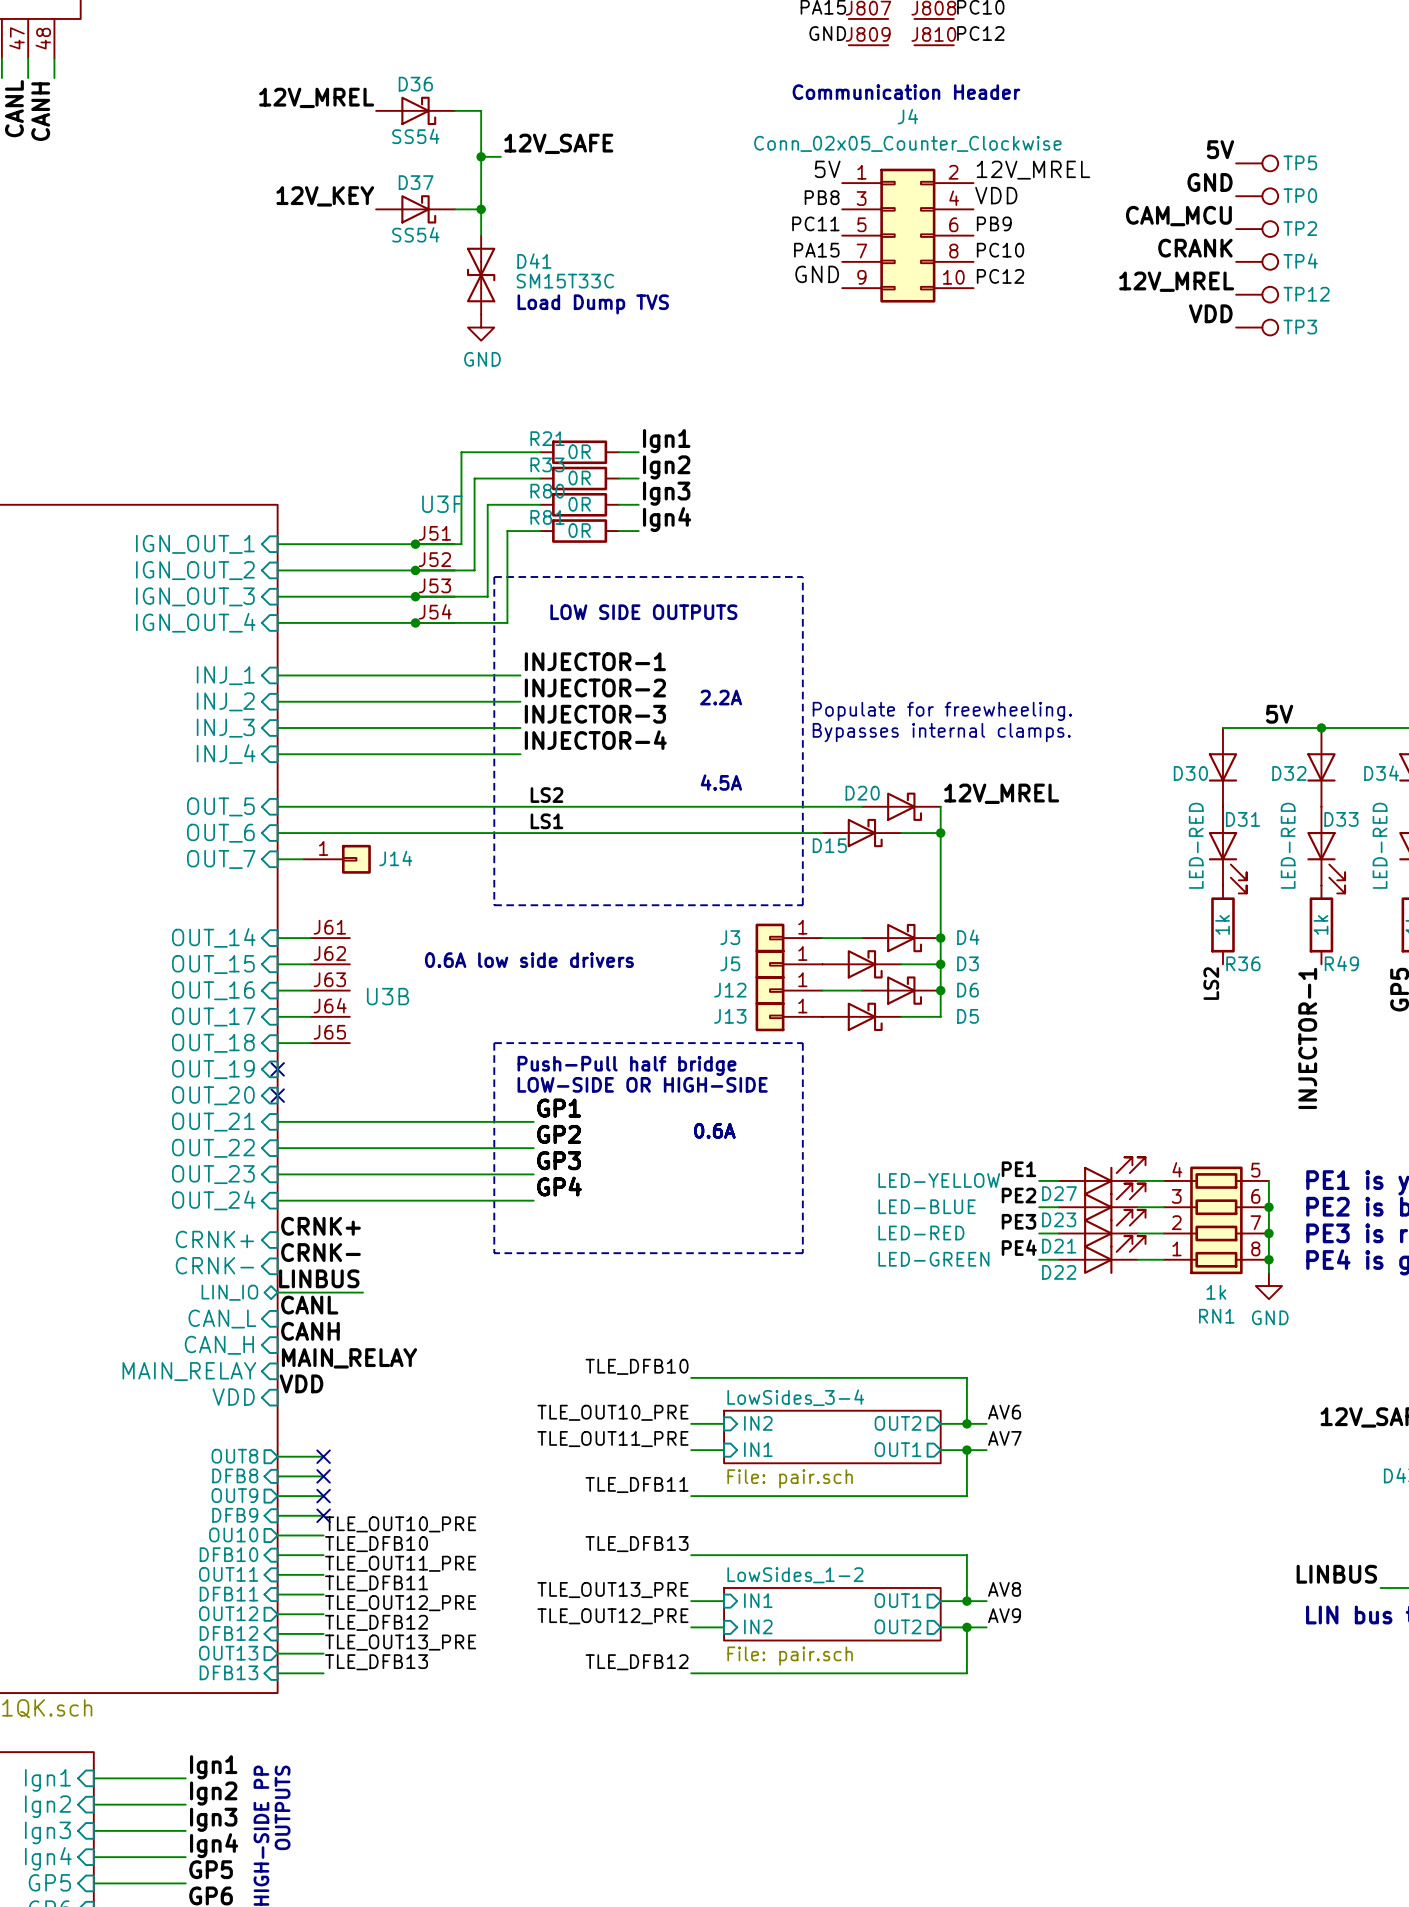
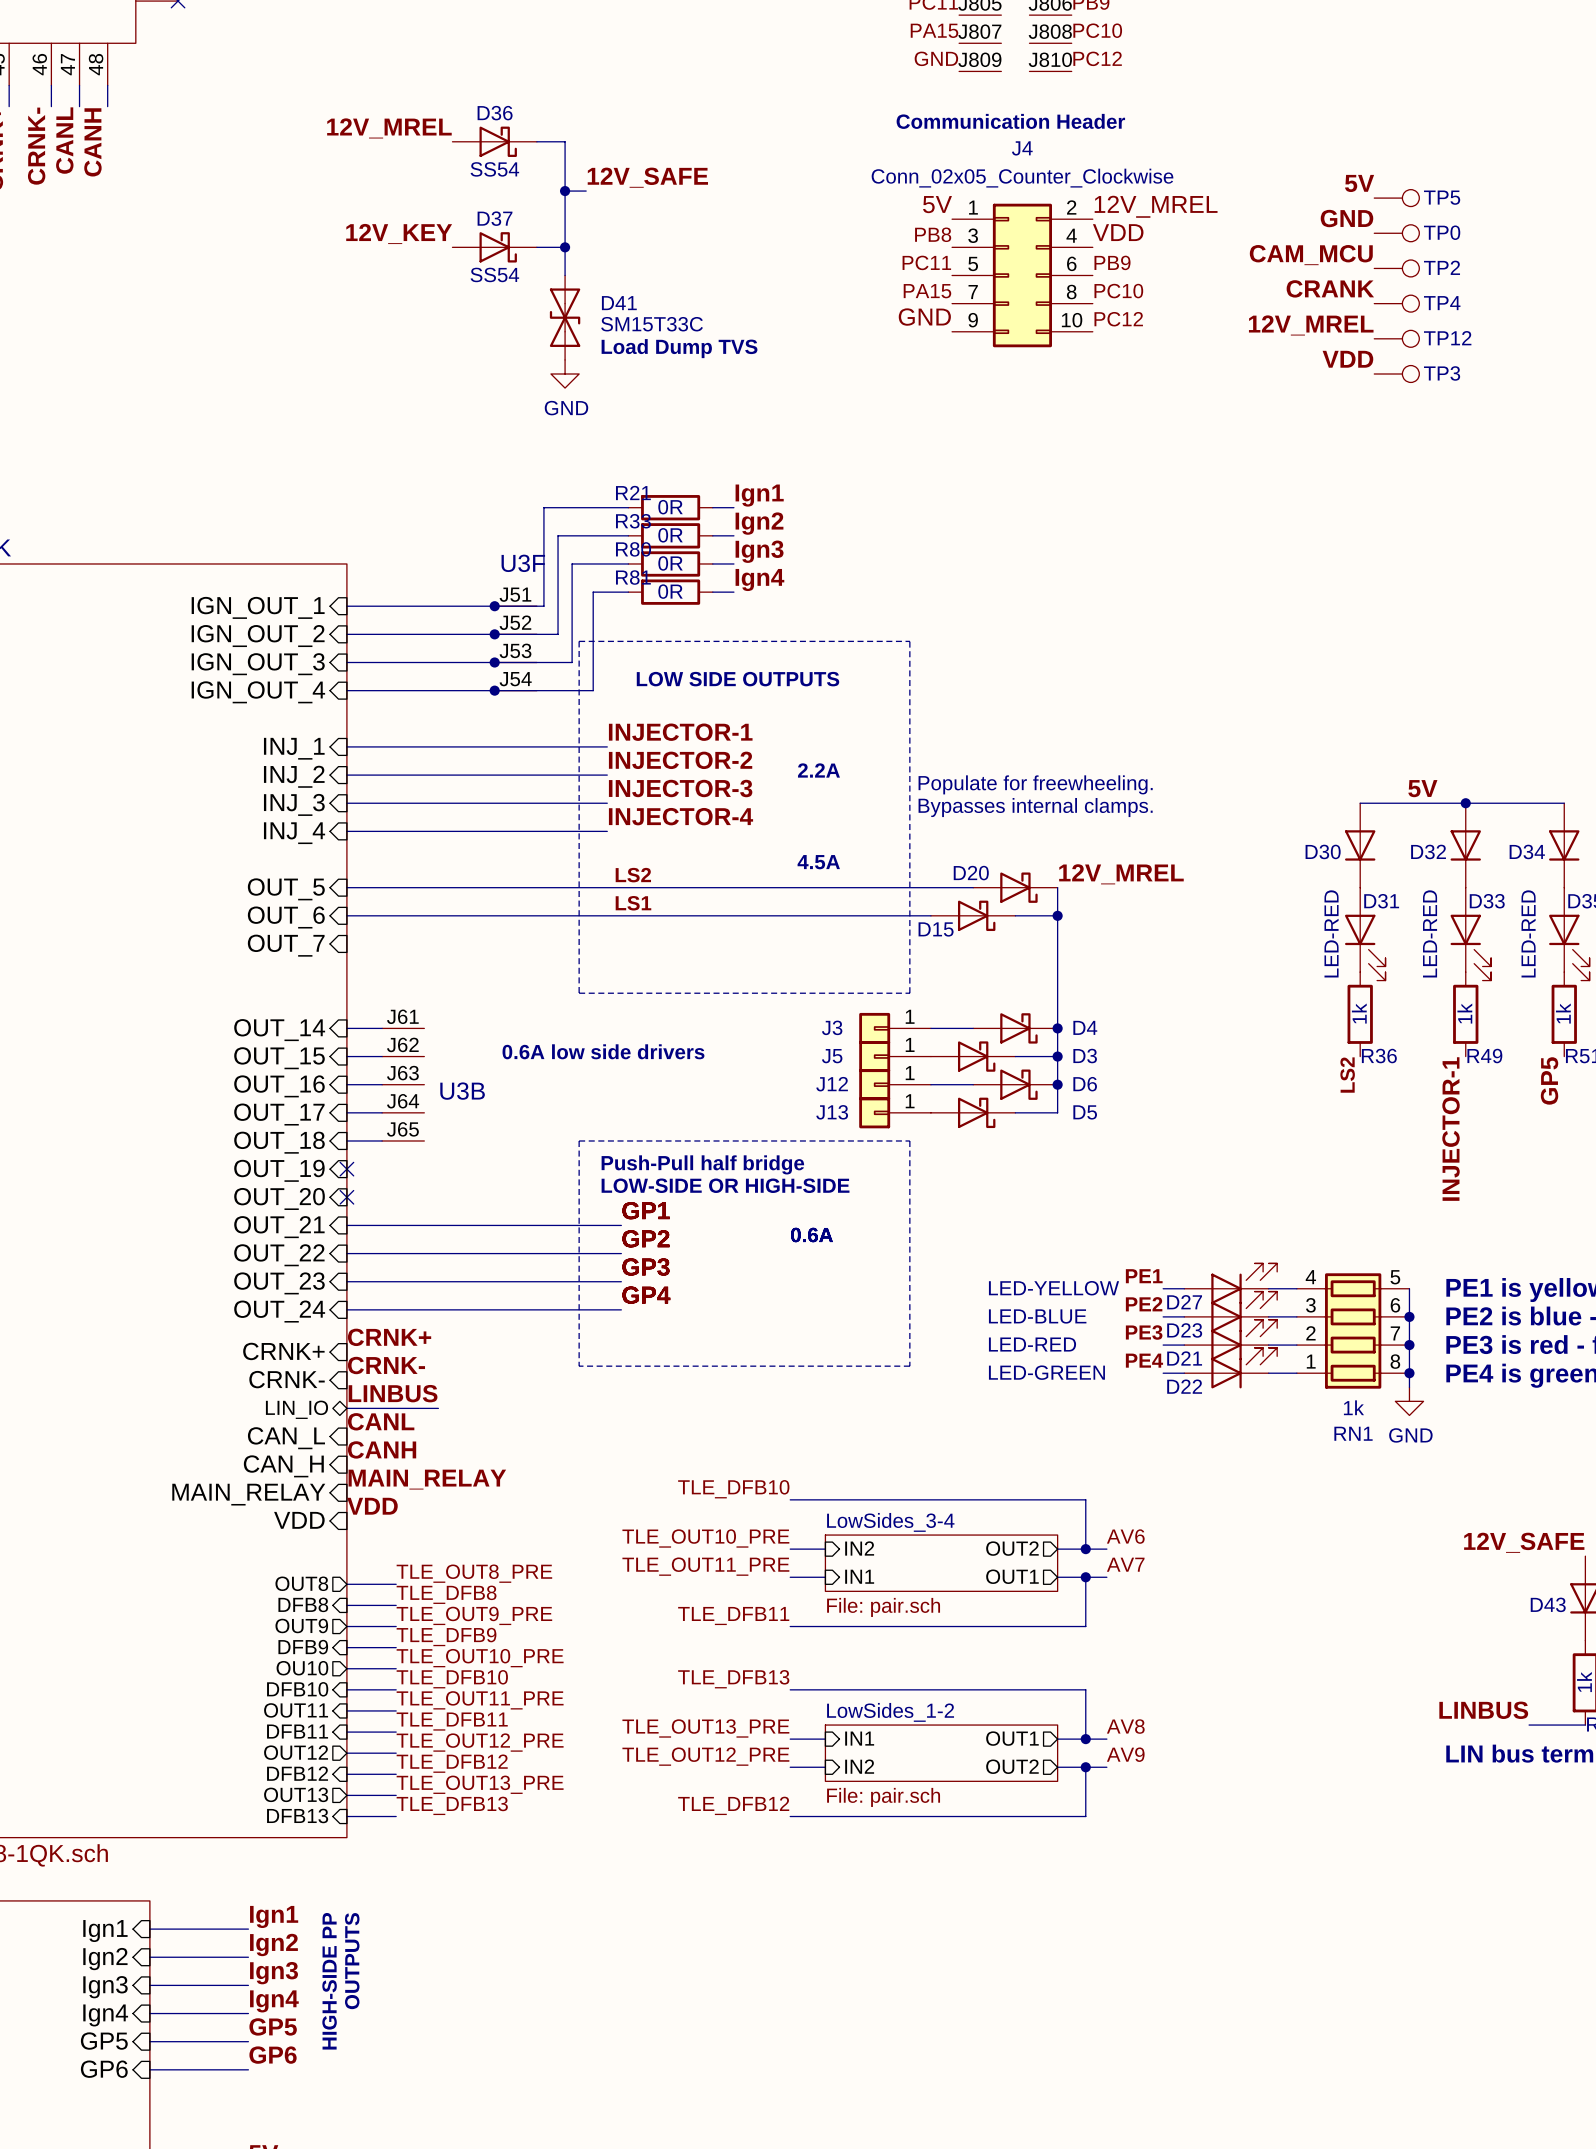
wire: (277, 859) (303, 859) -> none
J14: (337, 859) -> none
label: none -> TLE_OUT8_PRE (474, 1573)
no-connect mark: (323, 1456) -> none
label: none -> TLE_DFB8 (446, 1594)
no-connect mark: (323, 1476) -> none
label: none -> TLE_OUT9_PRE (474, 1615)
no-connect mark: (323, 1496) -> none
label: none -> TLE_DFB9 (446, 1637)
no-connect mark: (323, 1515) -> none

